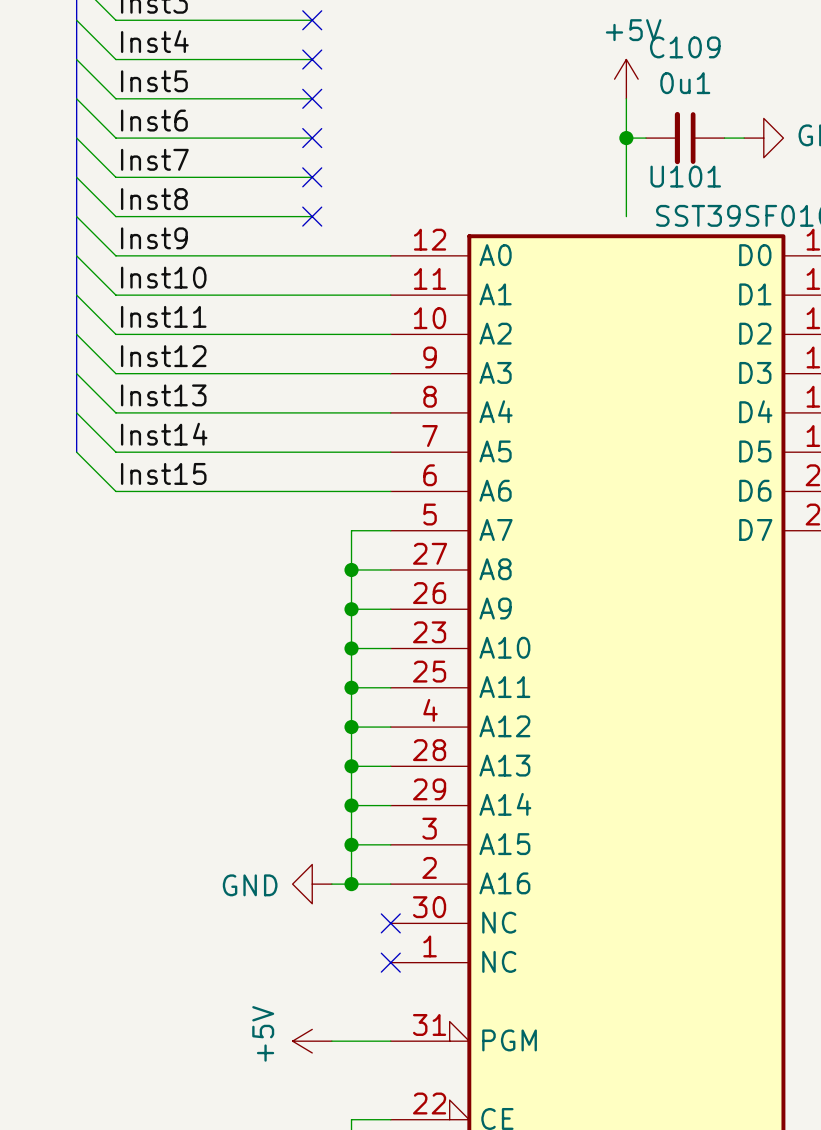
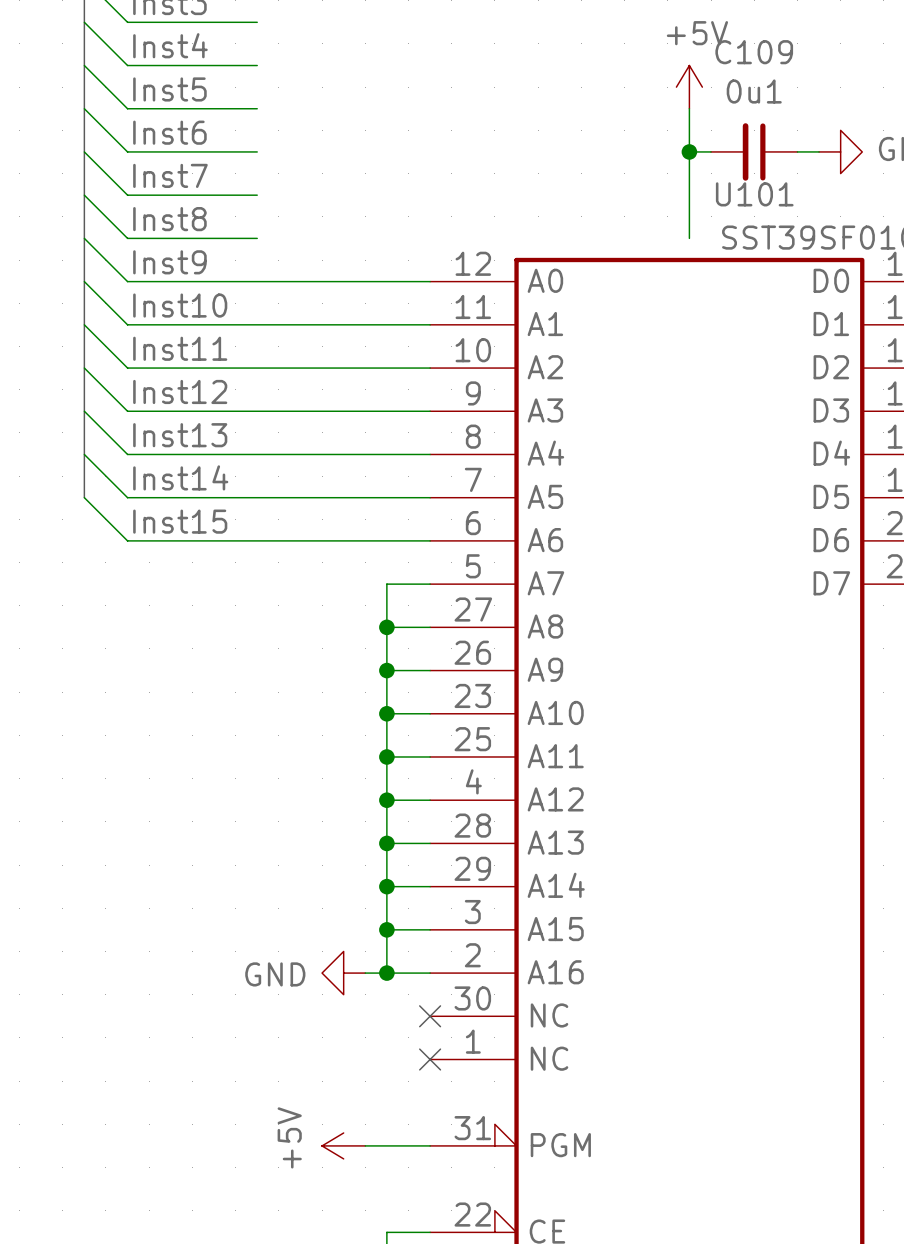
wire: (233, 20) (312, 20) -> none
no-connect mark: (312, 20) -> none
wire: (233, 59) (312, 59) -> none
no-connect mark: (312, 59) -> none
wire: (233, 98) (312, 98) -> none
no-connect mark: (312, 98) -> none
wire: (233, 138) (312, 138) -> none
no-connect mark: (312, 138) -> none
wire: (233, 177) (312, 177) -> none
no-connect mark: (312, 177) -> none
wire: (233, 216) (312, 216) -> none
no-connect mark: (312, 216) -> none

